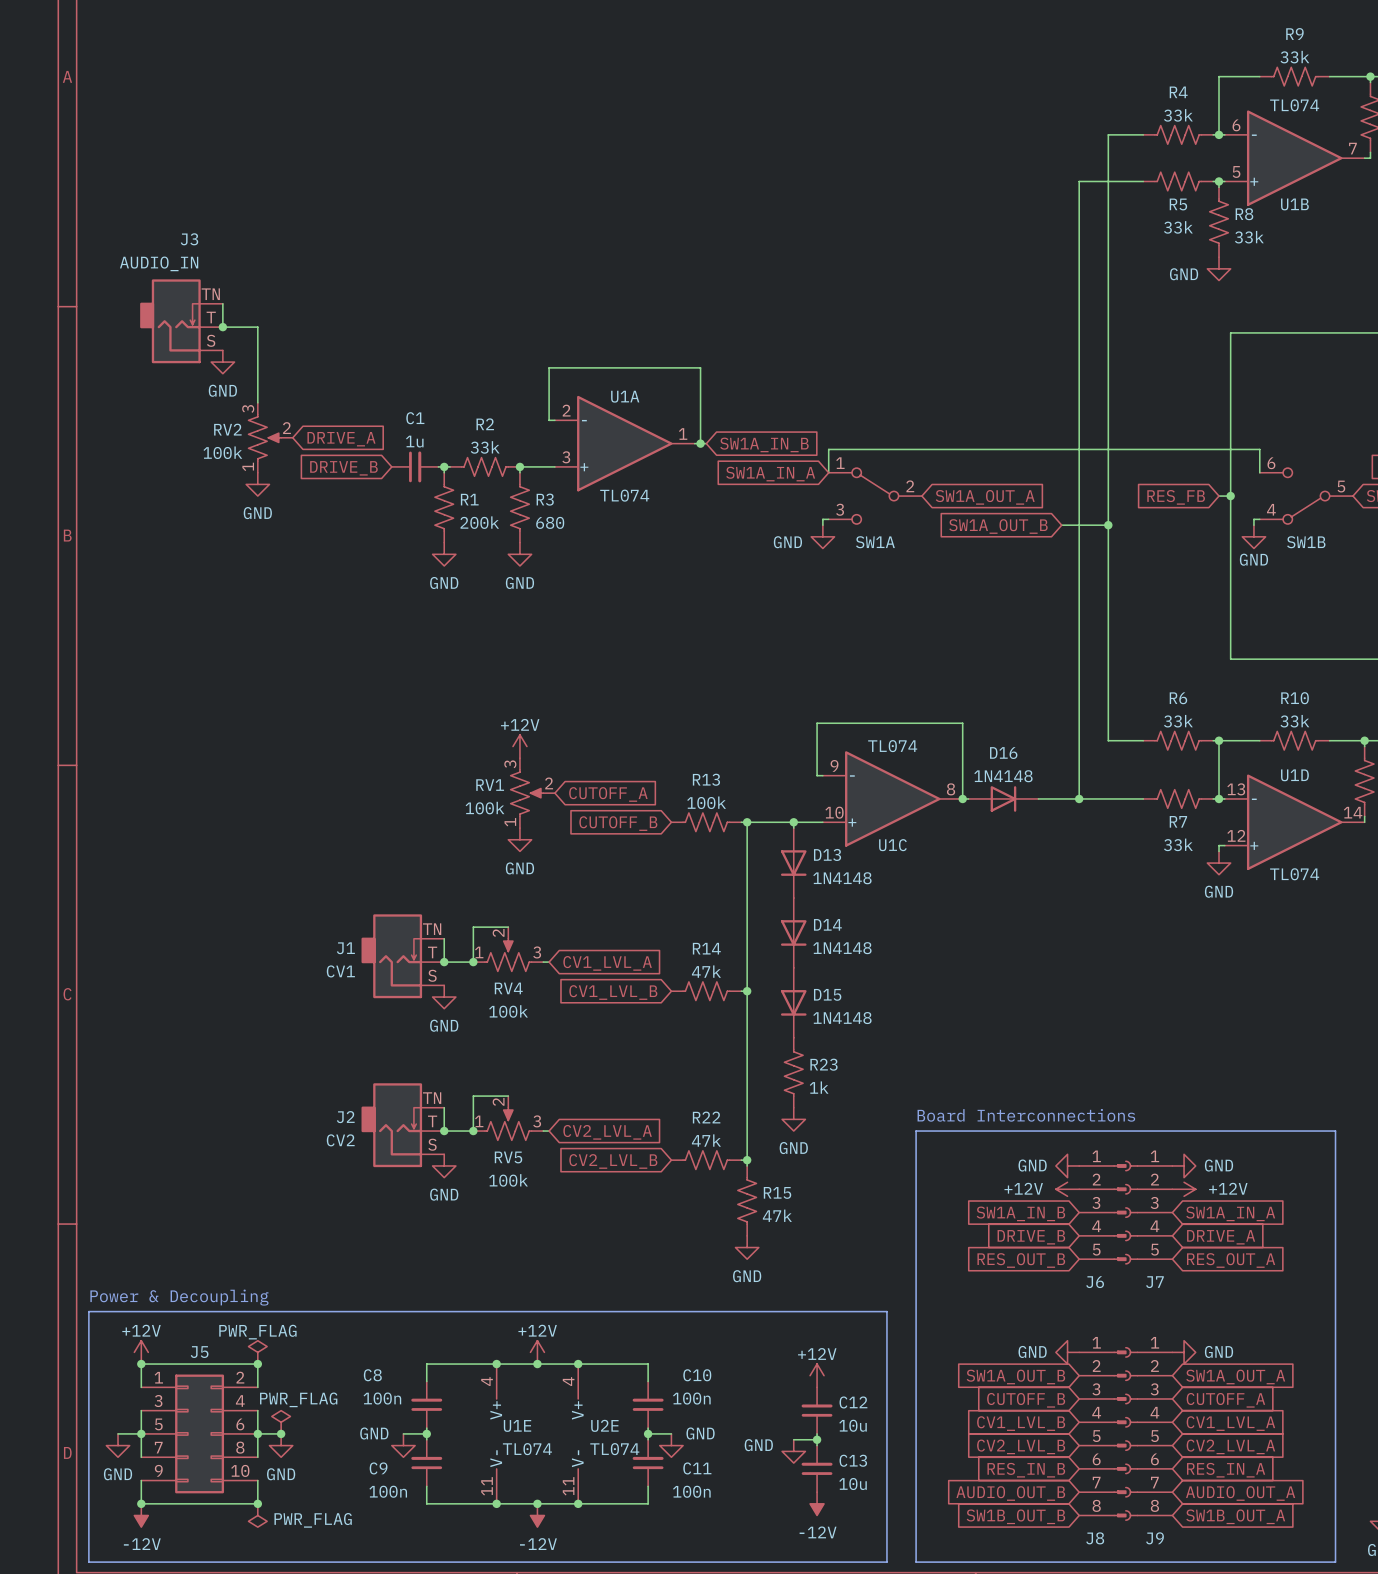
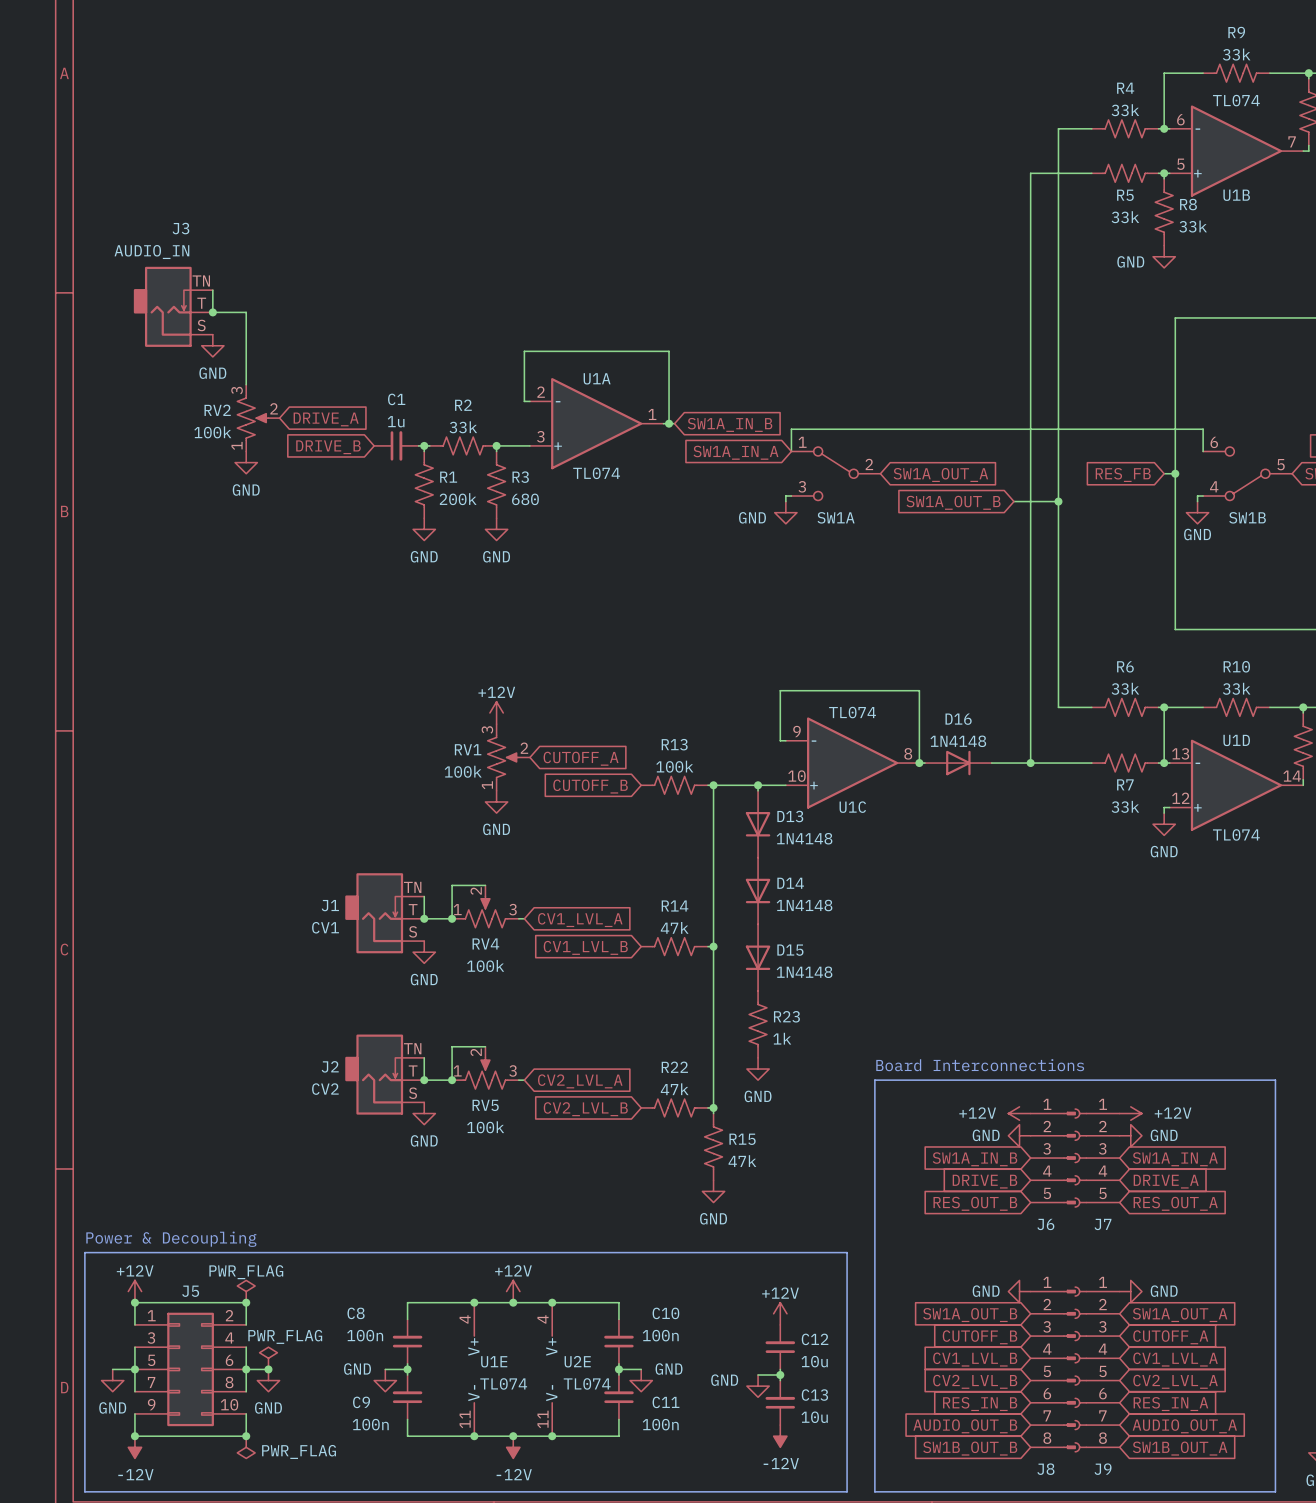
power symbol: GND (1067, 1165) -> +12V (1019, 1113)
power symbol: GND (1184, 1165) -> +12V (1130, 1113)
power symbol: +12V (1067, 1189) -> GND (1019, 1135)
power symbol: +12V (1184, 1189) -> GND (1130, 1135)

